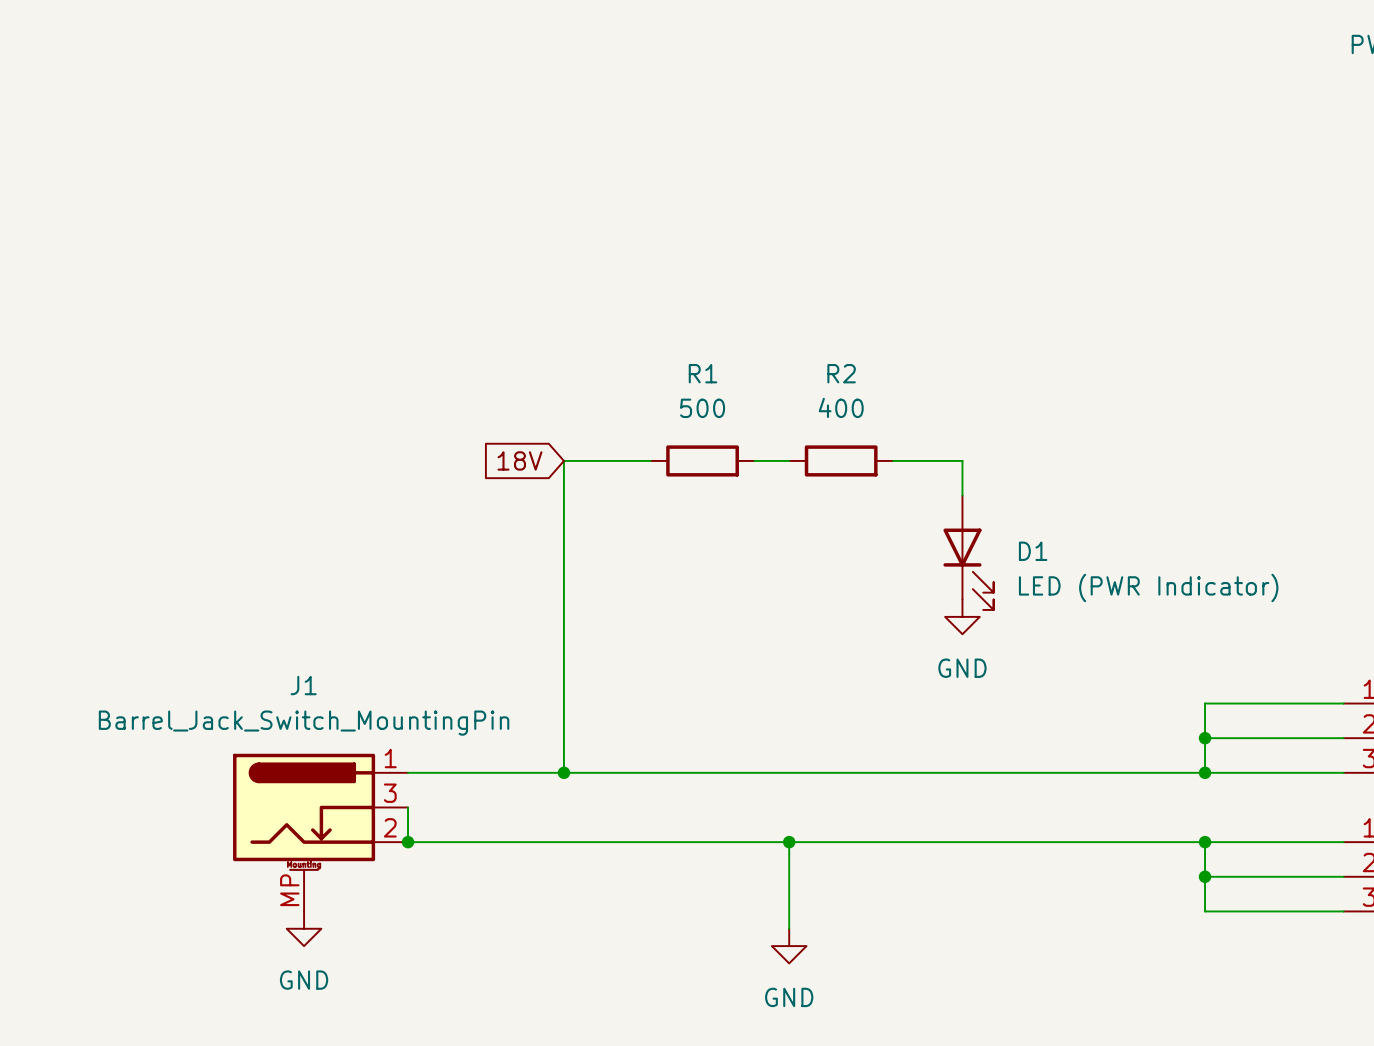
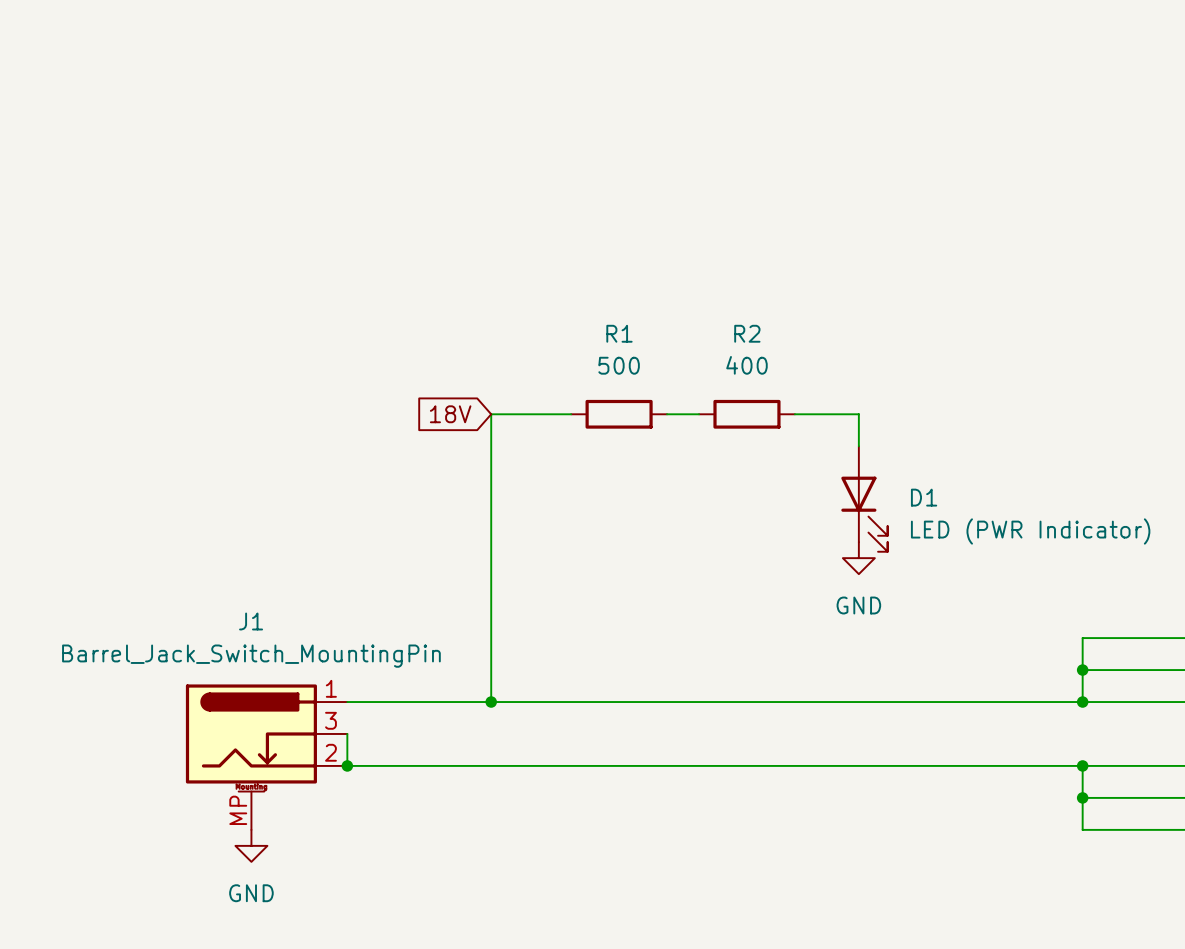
wire: (789, 842) (789, 928) -> none
junction: (789, 842) -> none
power symbol: GND (789, 946) -> none

